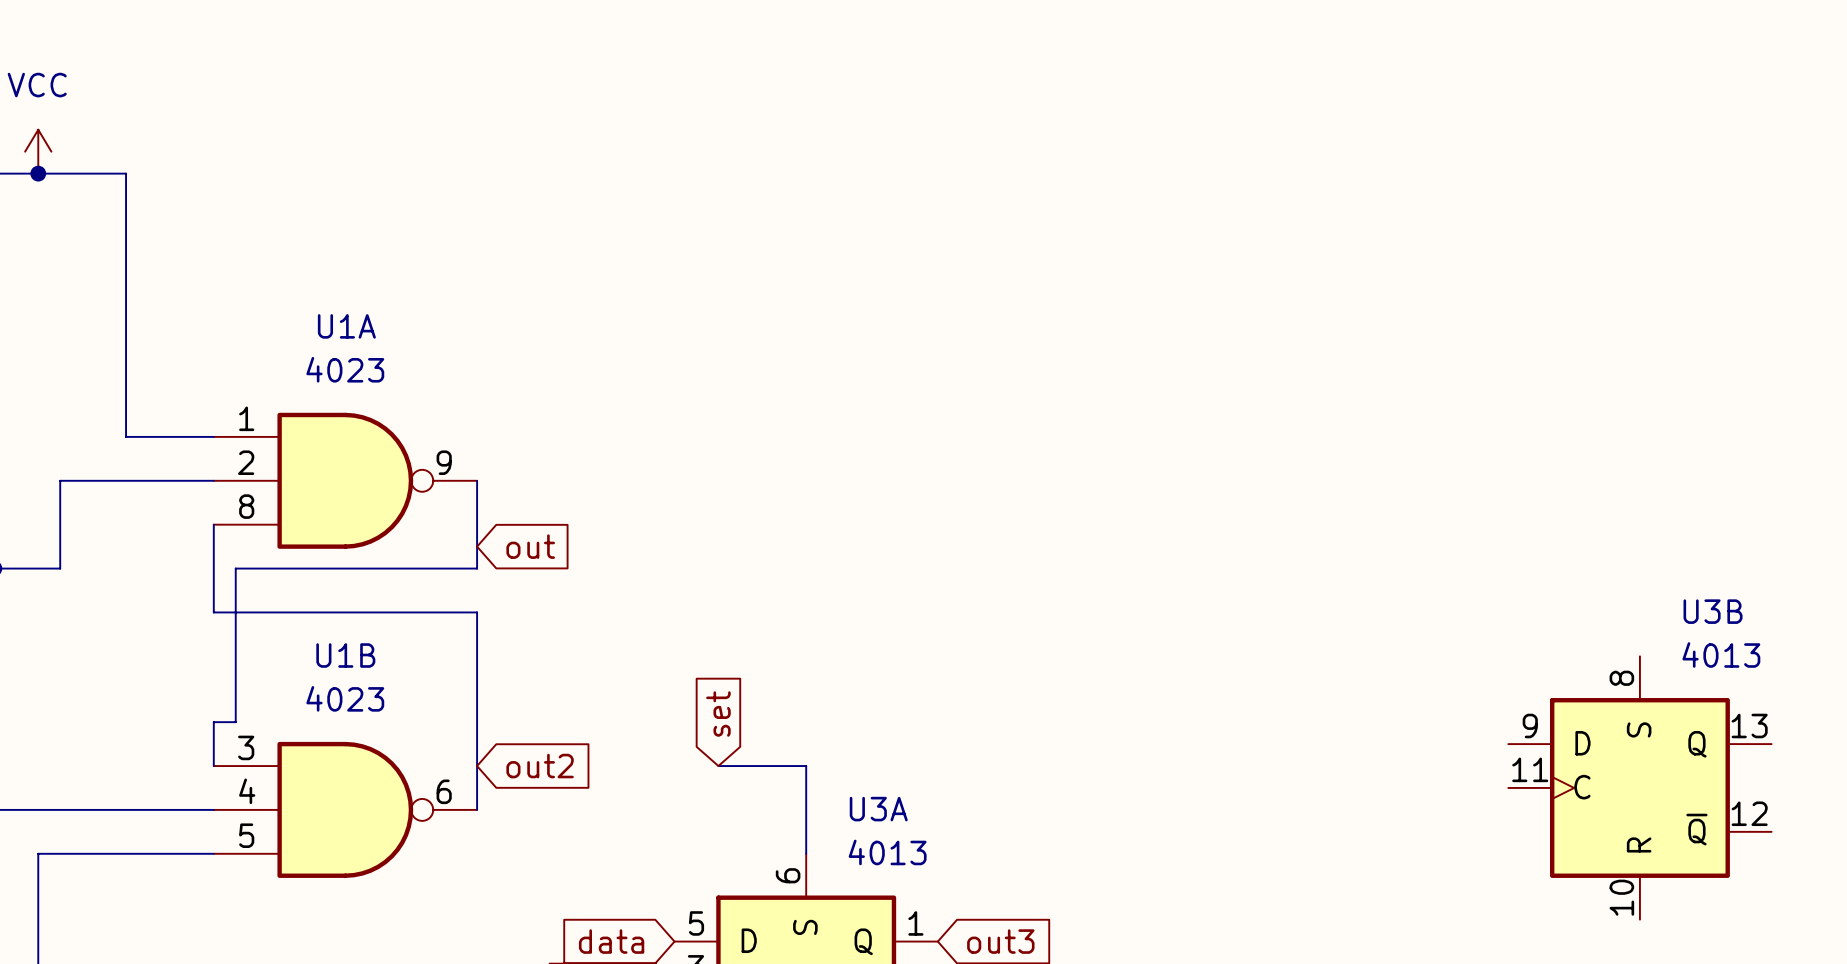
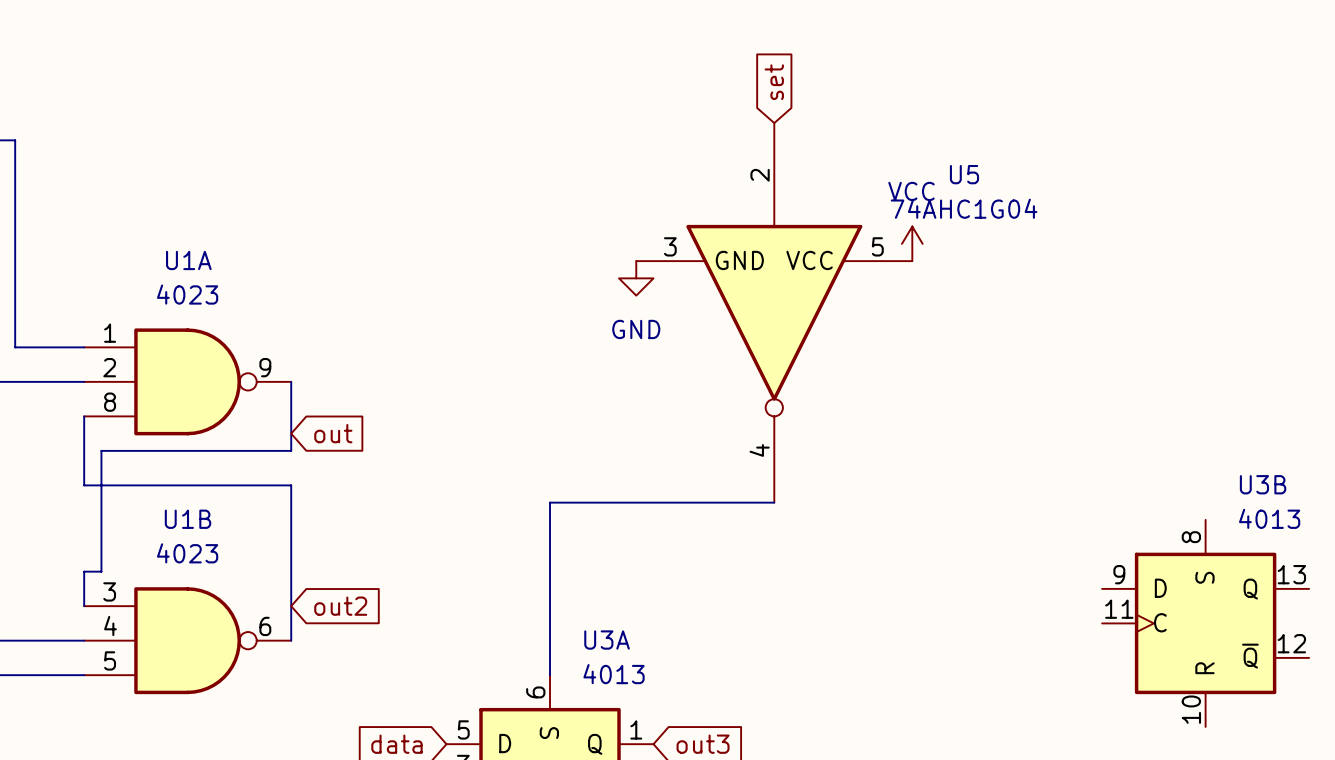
global label: none -> set (774, 82)
power symbol: none -> VCC (912, 243)
power symbol: none -> GND (636, 278)
U5: none -> 74AHC1G04 (774, 312)
global label: set (718, 714) -> none
wire: (718, 766) (806, 766) -> (774, 502) (550, 502) (550, 606)

